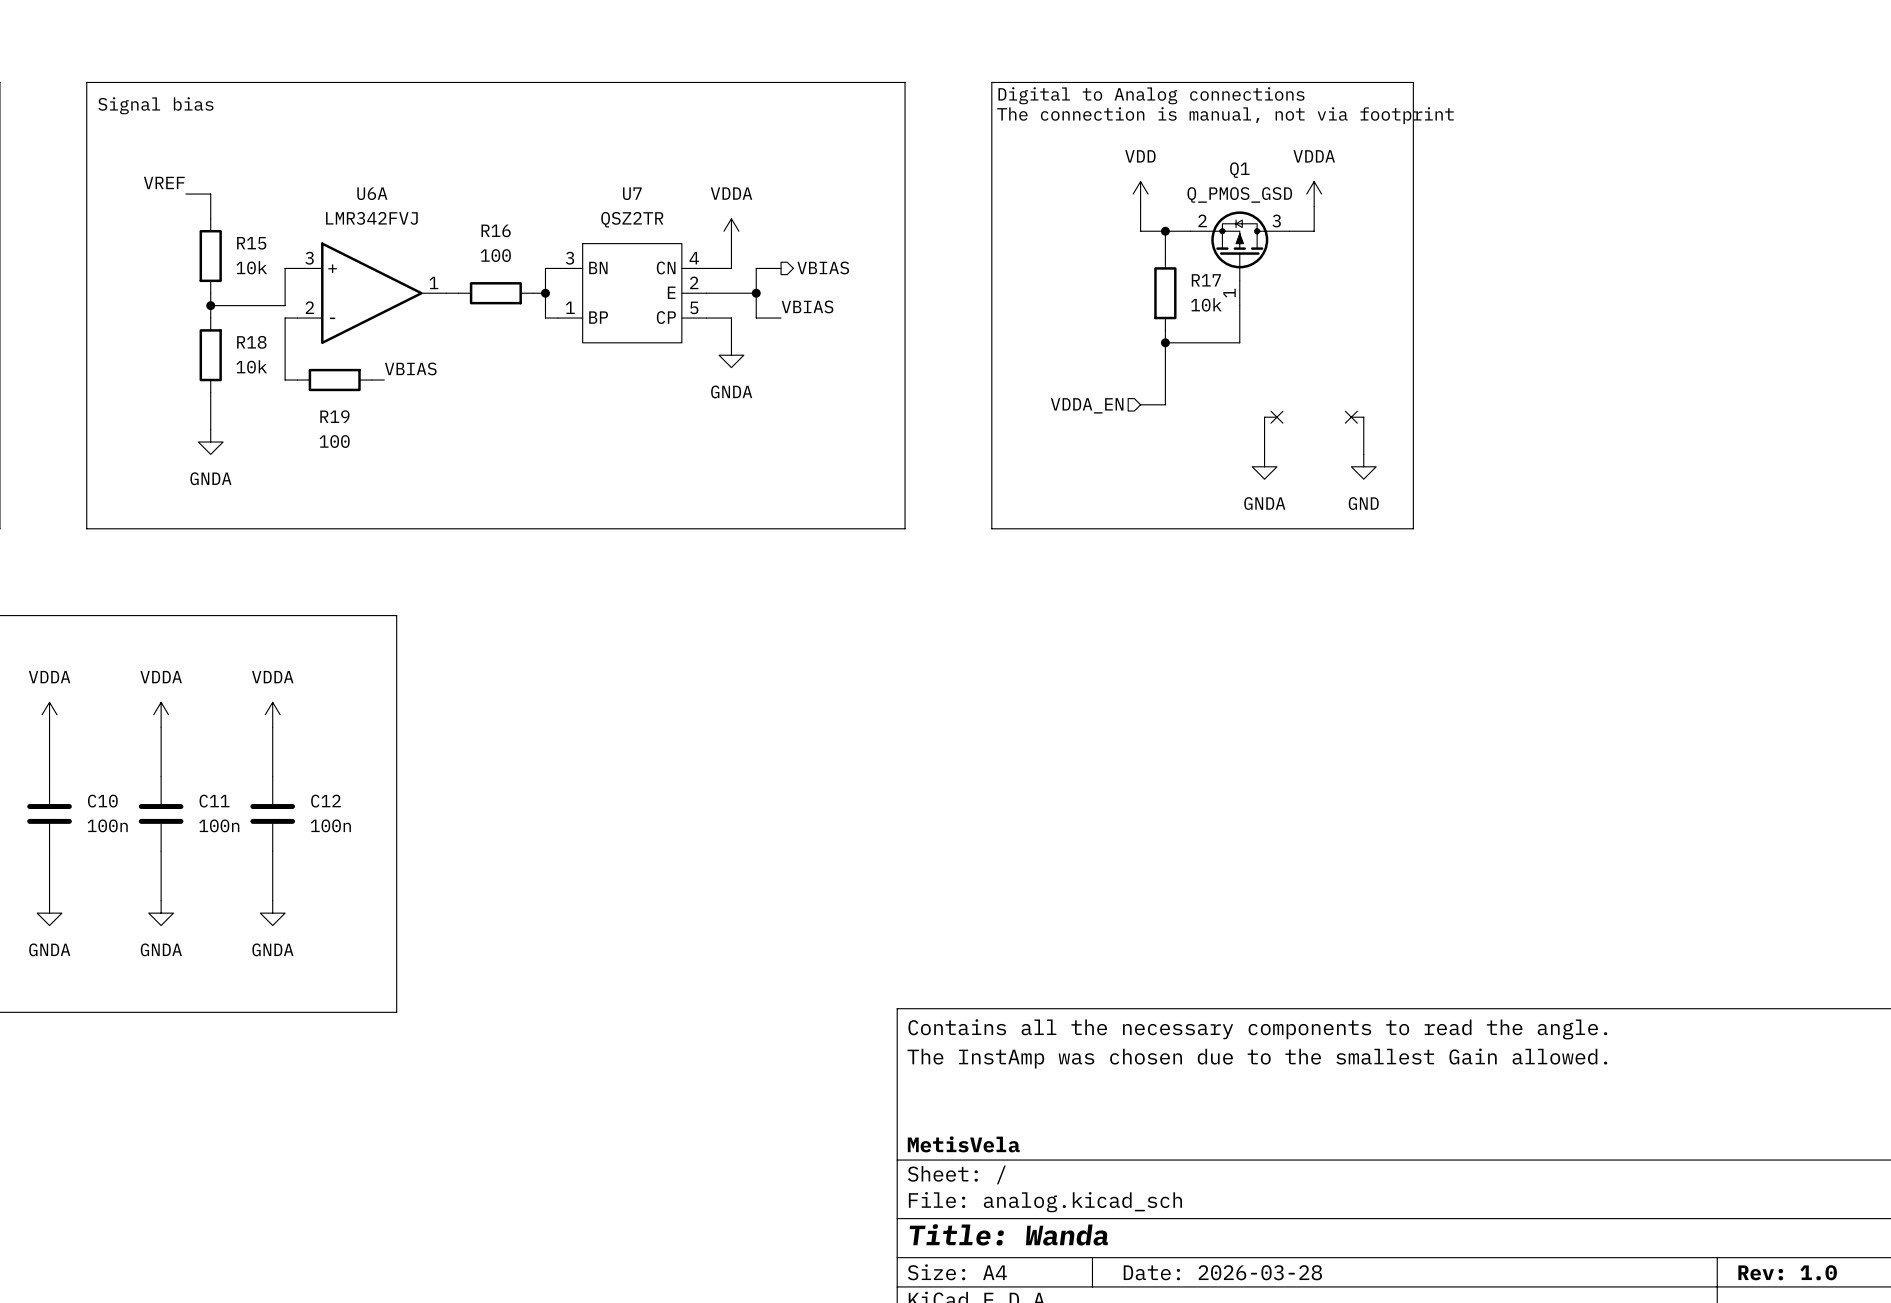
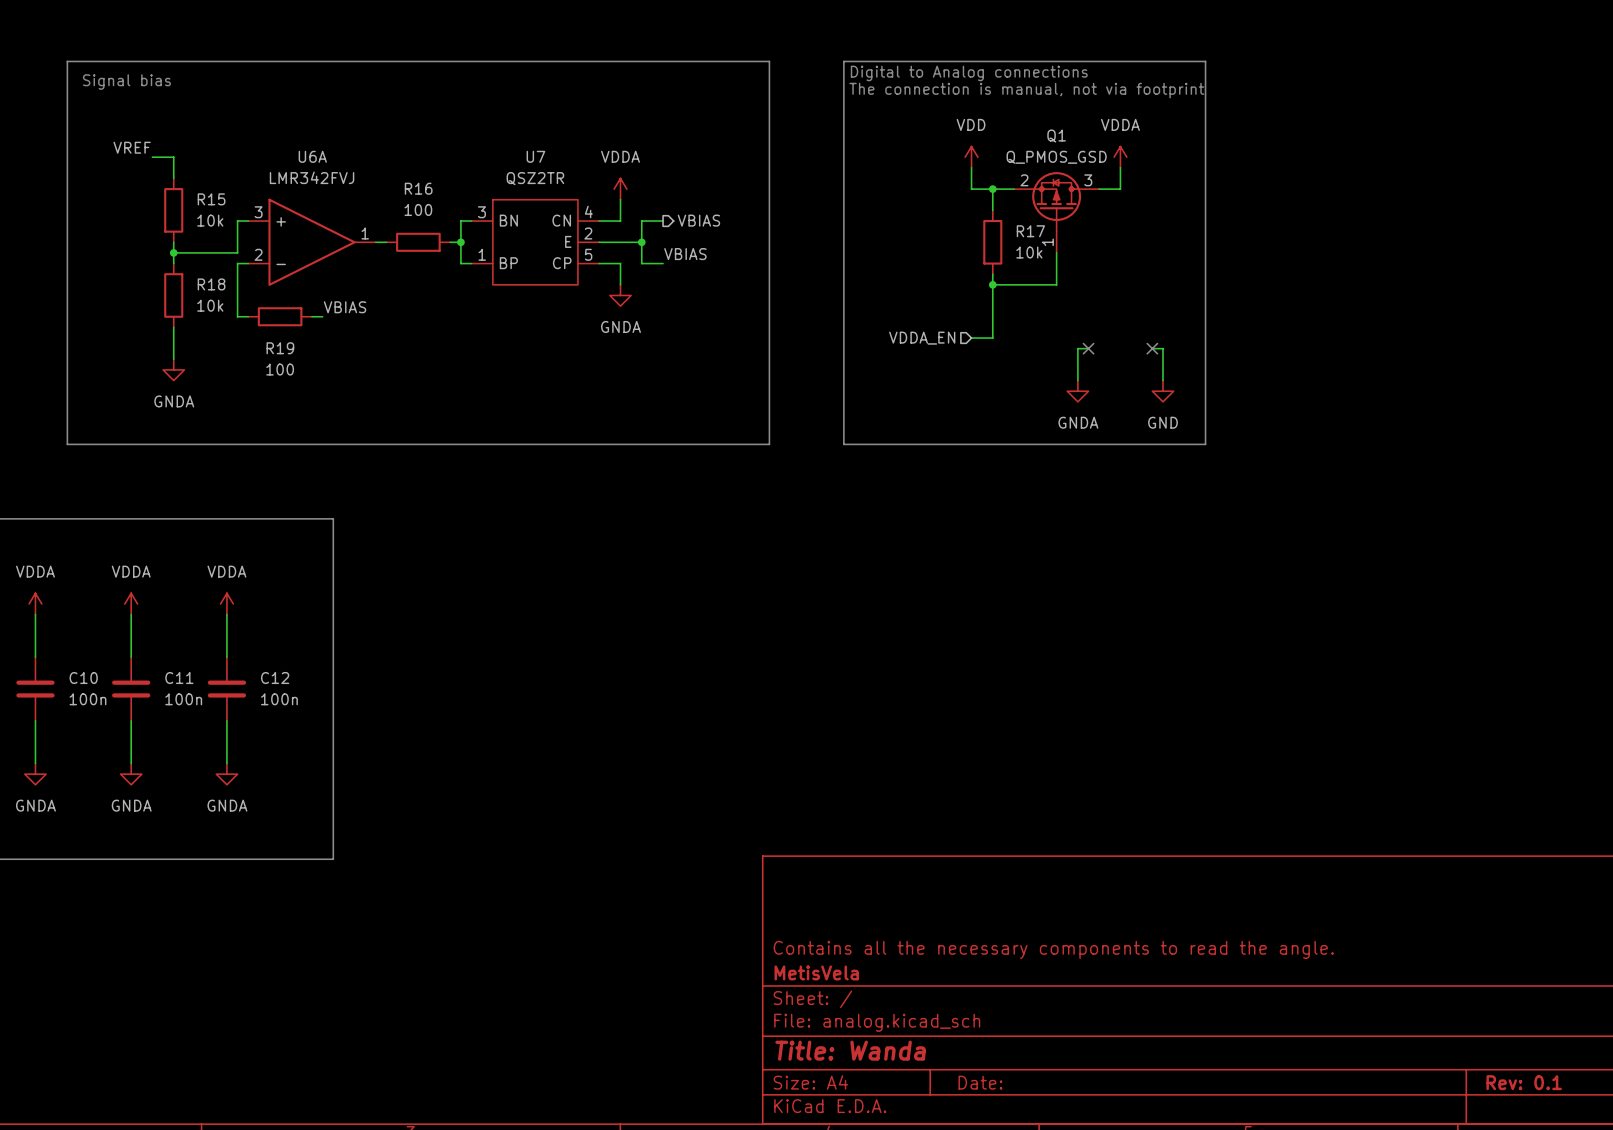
title block position: Contains all the necessary components to read the angle. (1257, 1029) -> Contains all the necessary components to read the angle. (1053, 949)
title block: The InstAmp was chosen due to the smallest Gain allowed. (1257, 1058) -> none
title block: Date: 2026-03-28 (1222, 1272) -> Date: (980, 1082)
title block: Rev: 1.0 (1787, 1272) -> Rev: 0.1 (1524, 1082)

